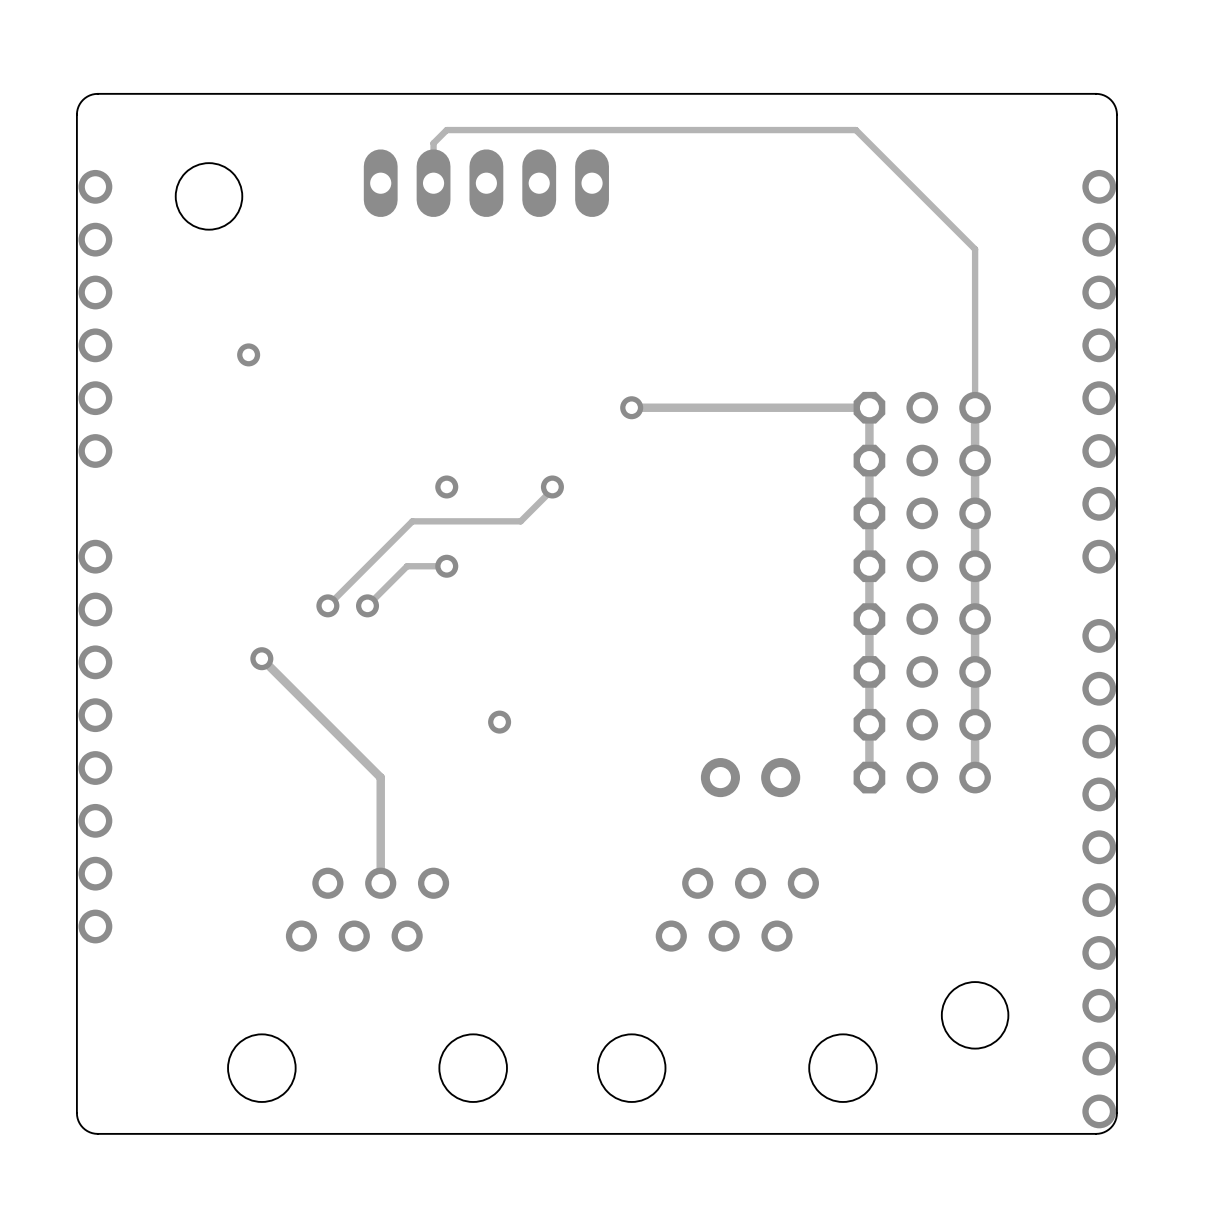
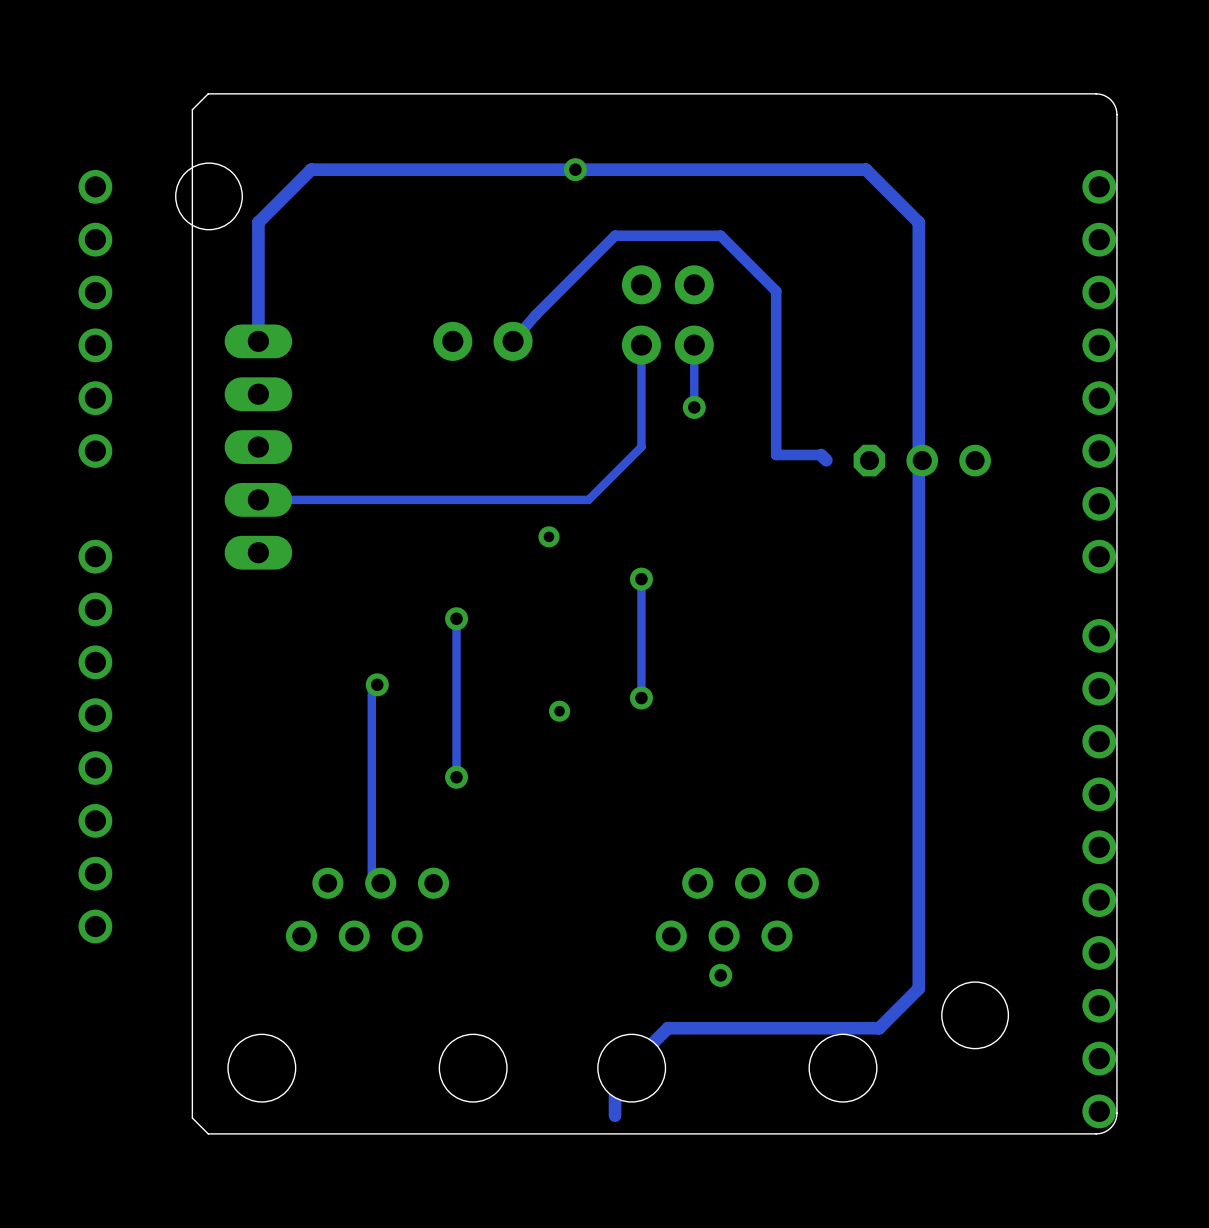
board edge: (208, 93) (95, 94) (87, 96) (81, 101) (76, 114) (77, 1115) (83, 1127) (95, 1133) (208, 1133) -> (208, 93) (192, 109) (192, 1118) (208, 1133)
track: (433, 156) (433, 183) (433, 143) (446, 130) (855, 130) (975, 249) (975, 777) -> none
via: none -> (575, 169)
part rotation: 0° (486, 183) -> 90° clockwise (258, 447)
part position: (486, 183) -> (258, 447)
part: none -> (641, 314)
part: none -> (694, 314)
track: none -> (258, 341) (258, 222) (311, 169) (866, 169) (918, 222) (918, 988) (879, 1028) (667, 1028) (615, 1081) (615, 1115)
part: none -> (482, 341)
track: none -> (513, 341) (535, 314) (615, 235) (720, 235) (776, 291) (776, 454) (821, 454) (826, 460)
track: none -> (641, 345) (641, 447) (588, 499) (258, 499)
track: none -> (694, 345) (694, 407)
via: (248, 354) -> none
track: (631, 407) (869, 407) (869, 777) -> none
via position: (631, 407) -> (694, 407)
part: (922, 407) -> none
via: (446, 486) -> none
track: (552, 486) (552, 489) (520, 521) (412, 521) (327, 605) -> none
via: (552, 486) -> none
part: (922, 513) -> none
via: none -> (548, 536)
track: (446, 566) (407, 566) (367, 605) -> none
via: (446, 566) -> none
part: (922, 566) -> none
track: none -> (641, 579) (641, 698)
via: none -> (641, 579)
via: (327, 605) -> none
via: (367, 605) -> none
track: none -> (456, 618) (456, 777)
via: none -> (456, 618)
part: (922, 619) -> none
track: (261, 658) (380, 777) (380, 883) -> none
via: (261, 658) -> none
part: (922, 671) -> none
track: none -> (377, 684) (371, 690) (371, 877)
via: none -> (377, 684)
via: none -> (641, 698)
via: none -> (559, 711)
via: (499, 722) -> none
part: (922, 724) -> none
via: none -> (456, 777)
part: (750, 777) -> none
part: (922, 777) -> none
via: none -> (720, 975)

